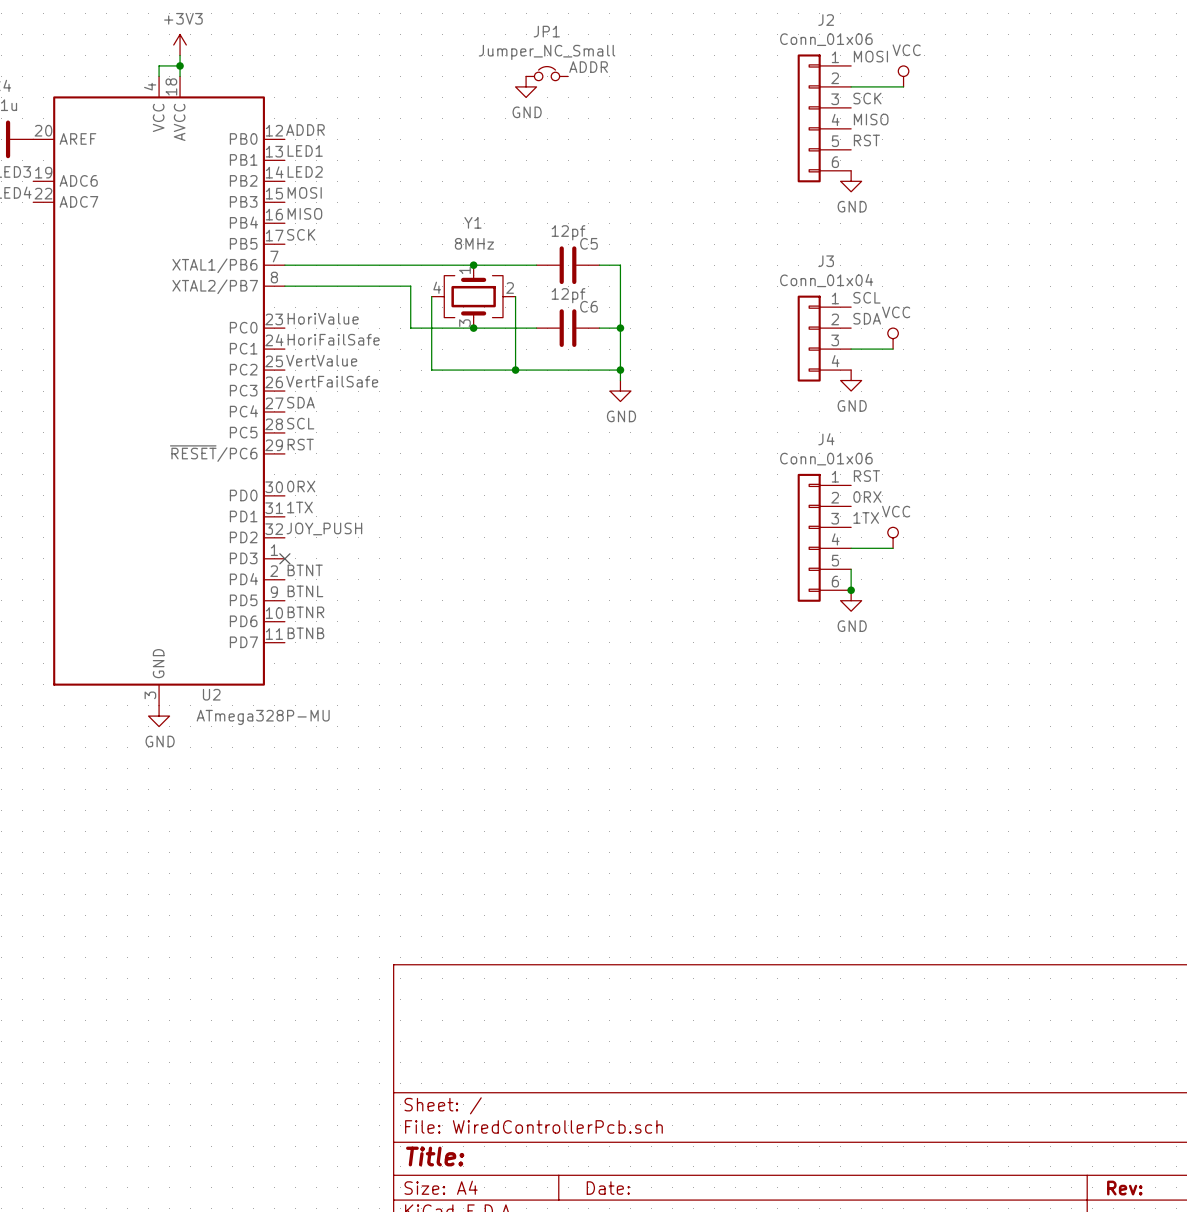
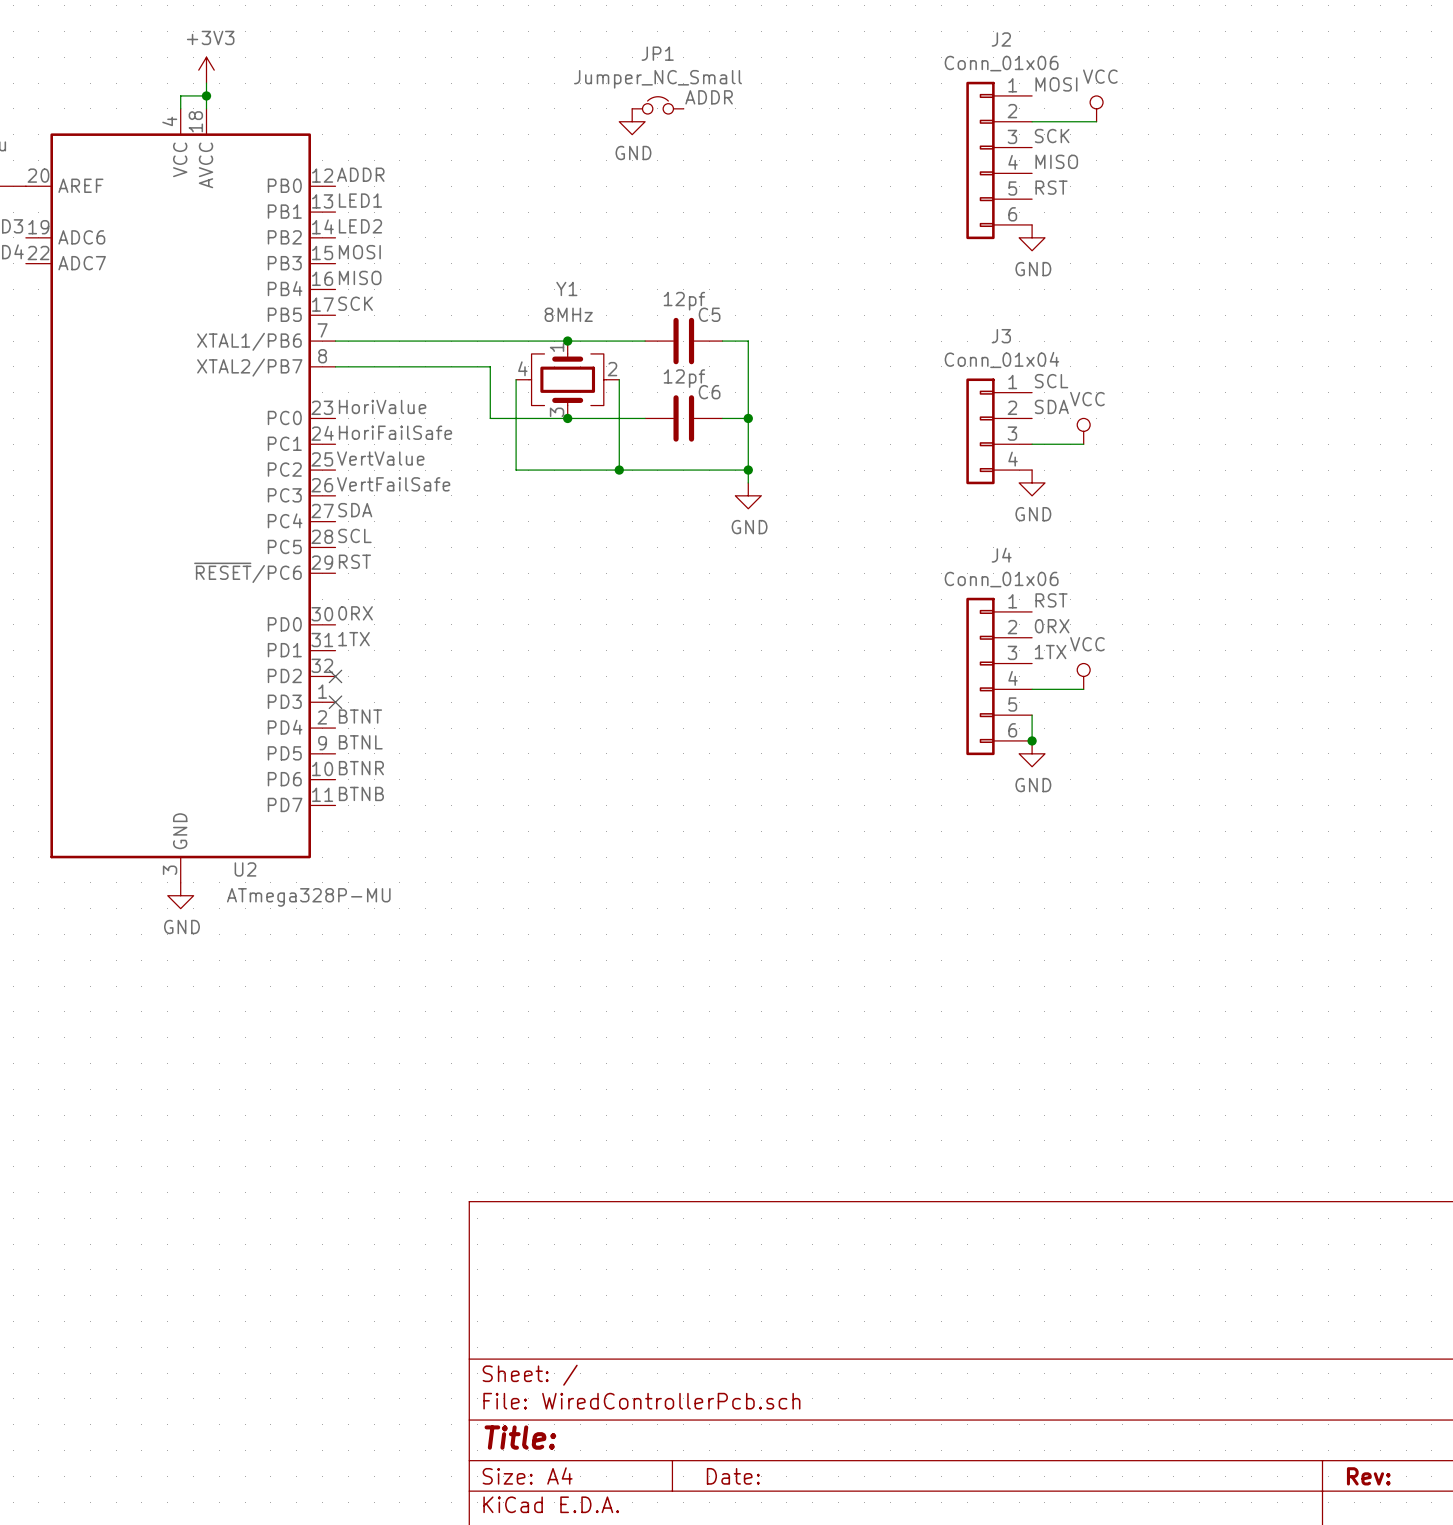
label: JOY_PUSH (324, 528) -> none
no-connect mark: none -> (335, 676)

